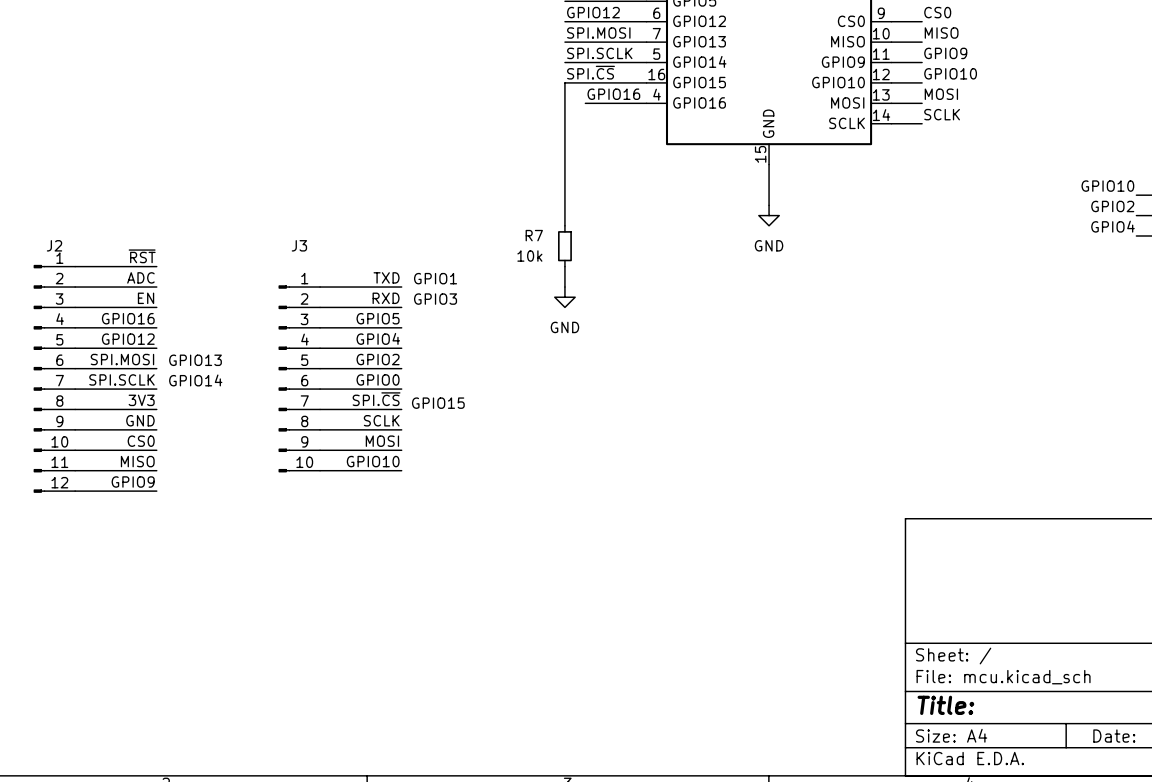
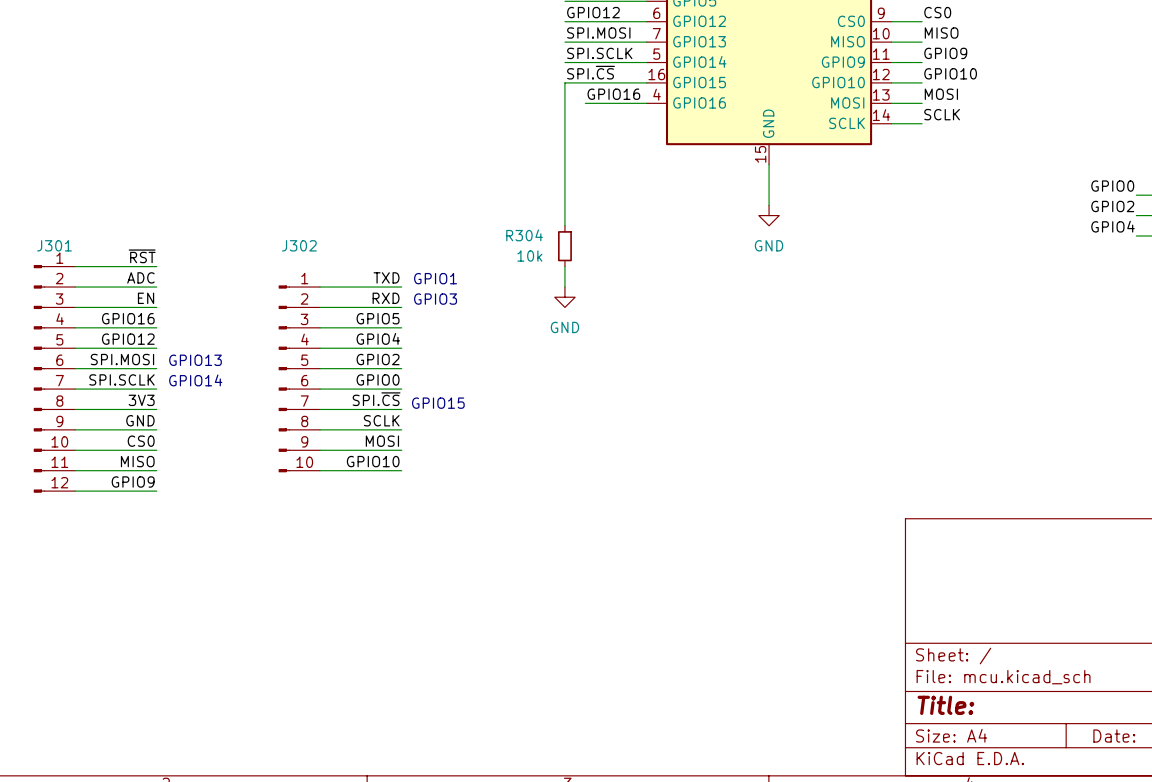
label: GPIO10 (1107, 186) -> GPIO0 (1112, 186)
R7 name: R7 (534, 235) -> R304 (524, 235)
J2 name: J2 (54, 245) -> J301 (54, 245)
J3 name: J3 (299, 245) -> J302 (299, 245)

